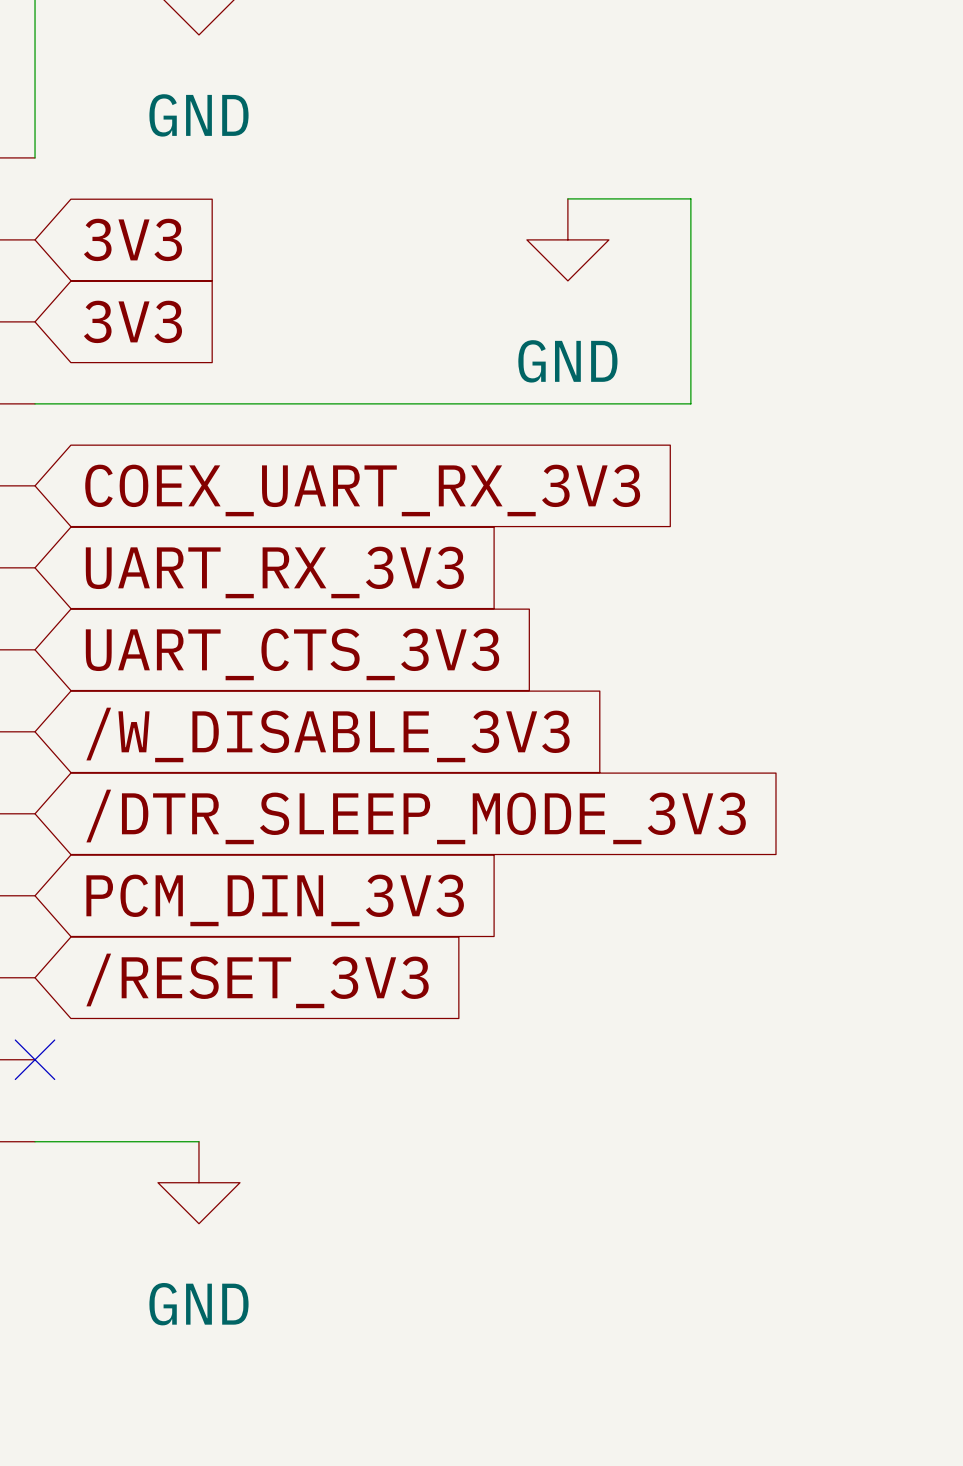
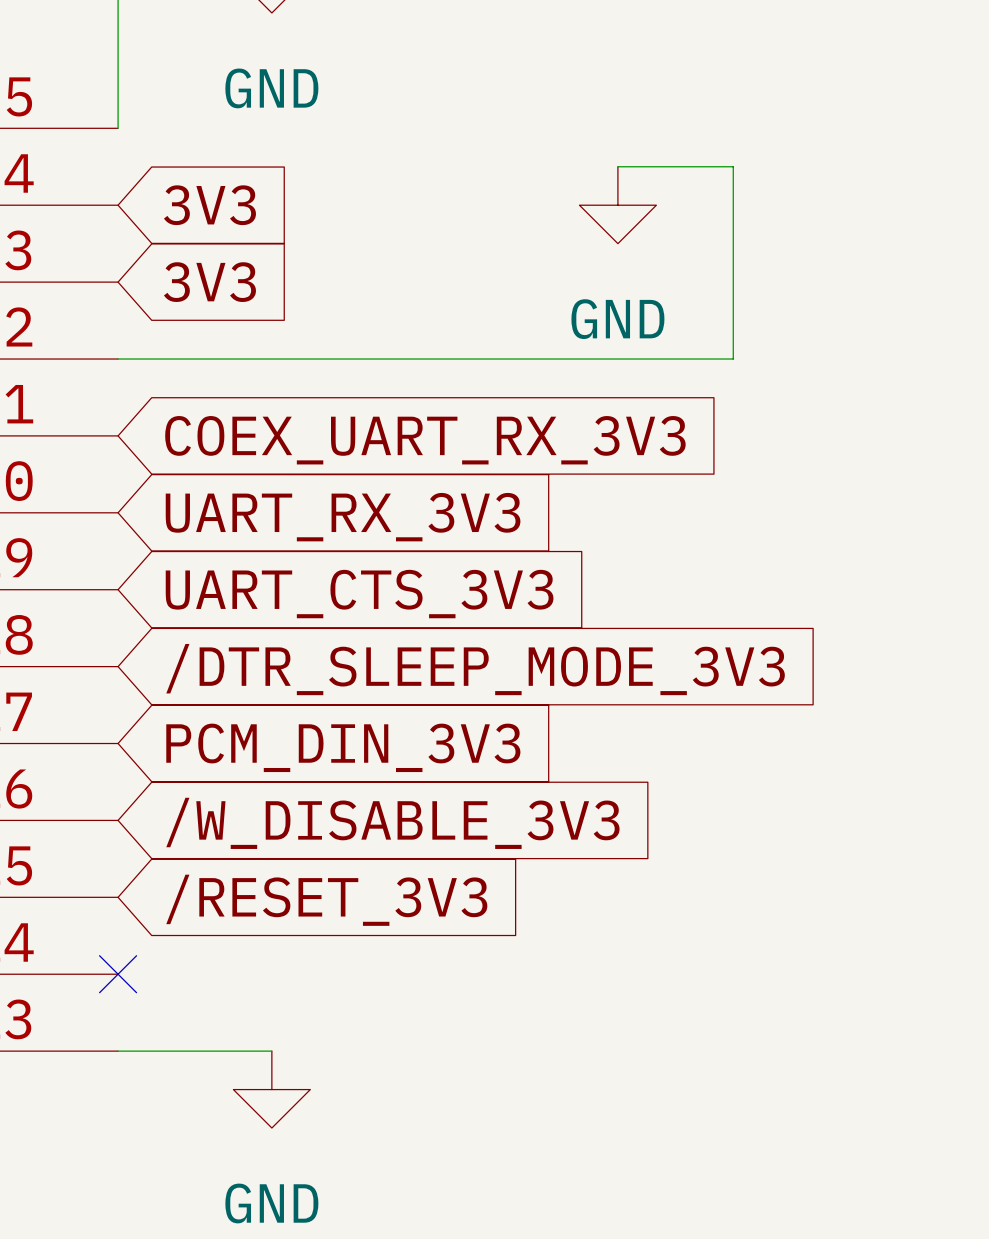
global label: /W_DISABLE_3V3 (328, 734) -> /DTR_SLEEP_MODE_3V3 (475, 669)
global label: /DTR_SLEEP_MODE_3V3 (416, 816) -> PCM_DIN_3V3 (343, 747)
global label: PCM_DIN_3V3 (275, 900) -> /W_DISABLE_3V3 (392, 823)

